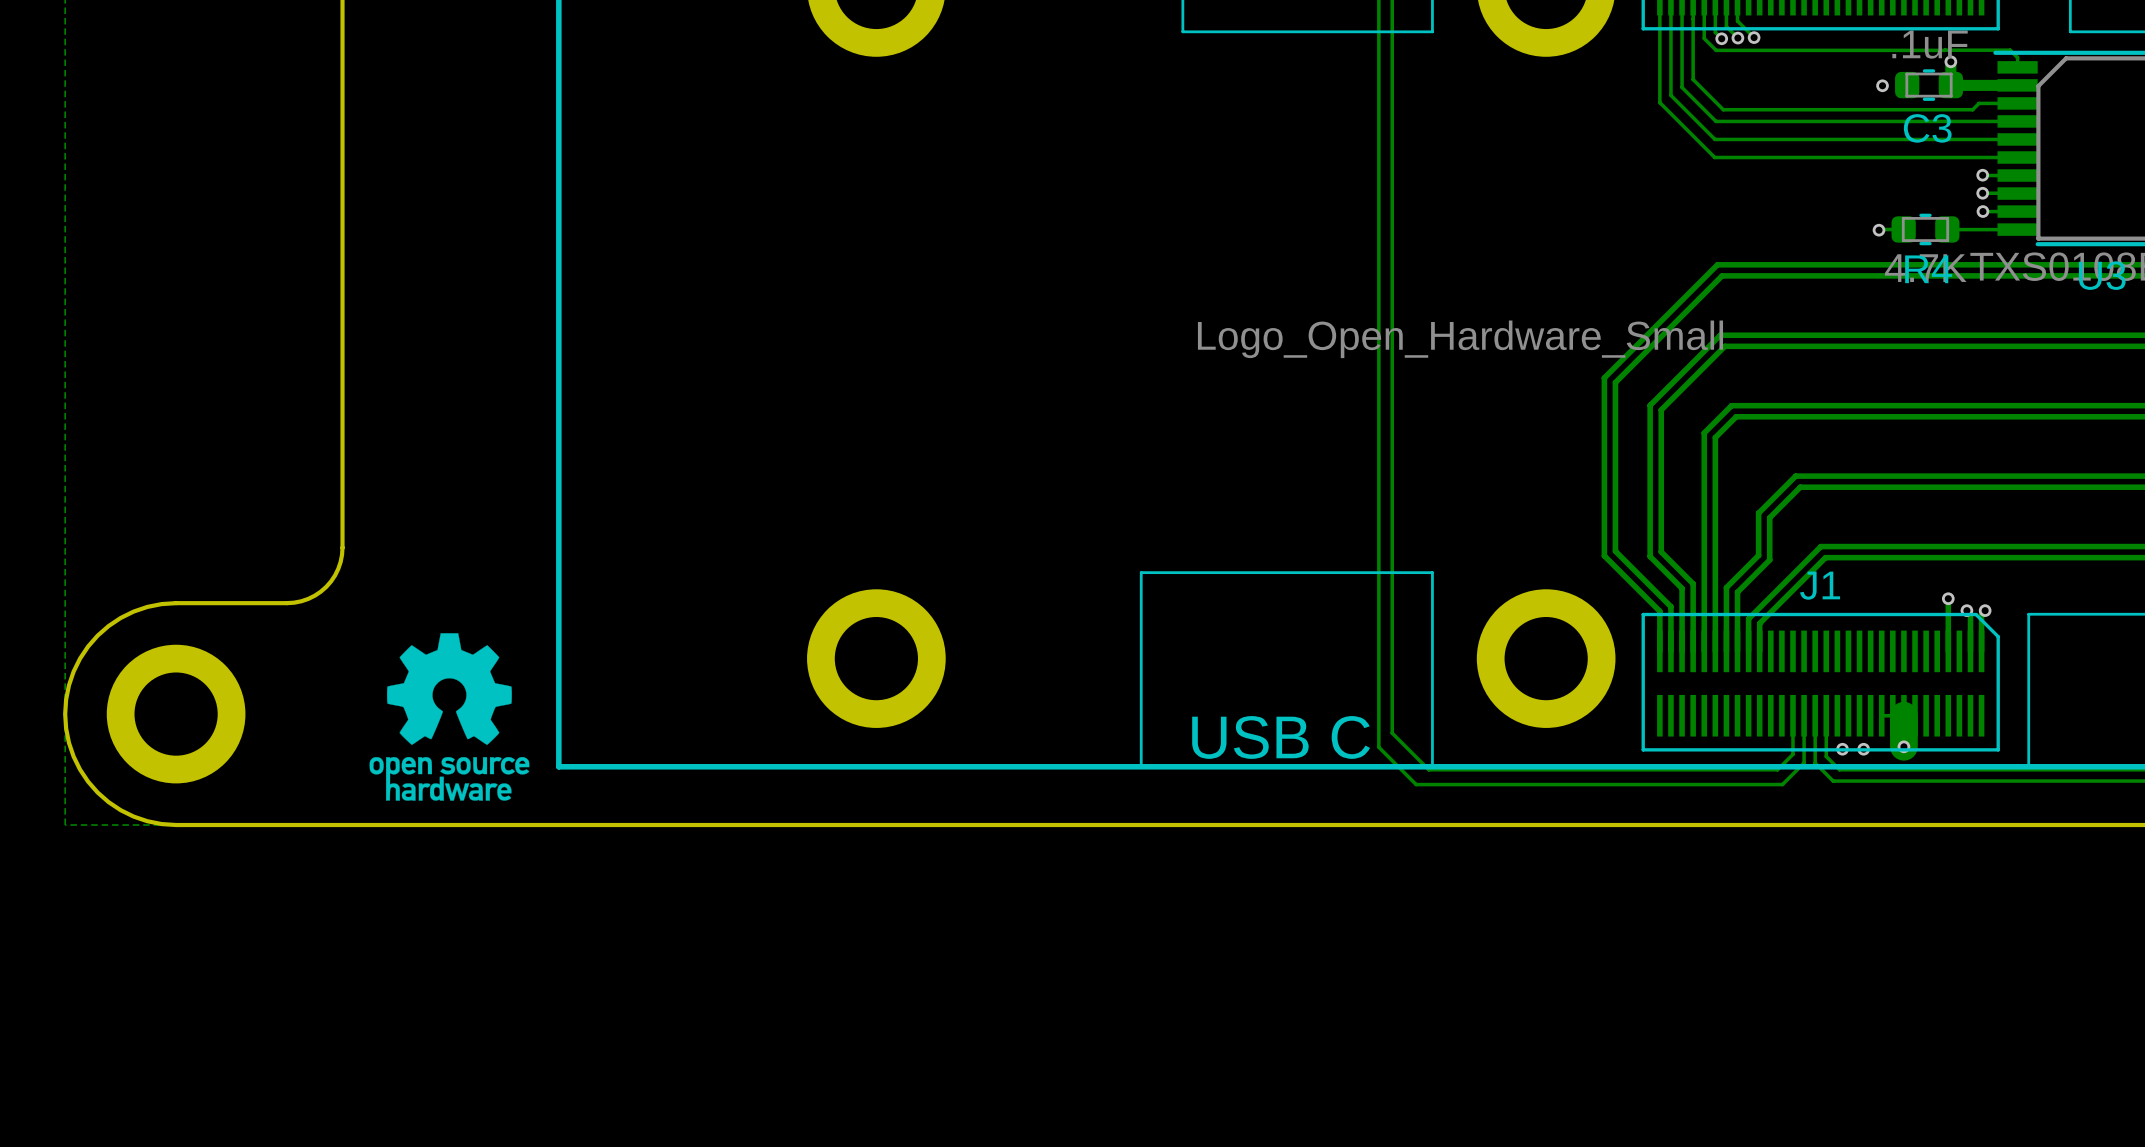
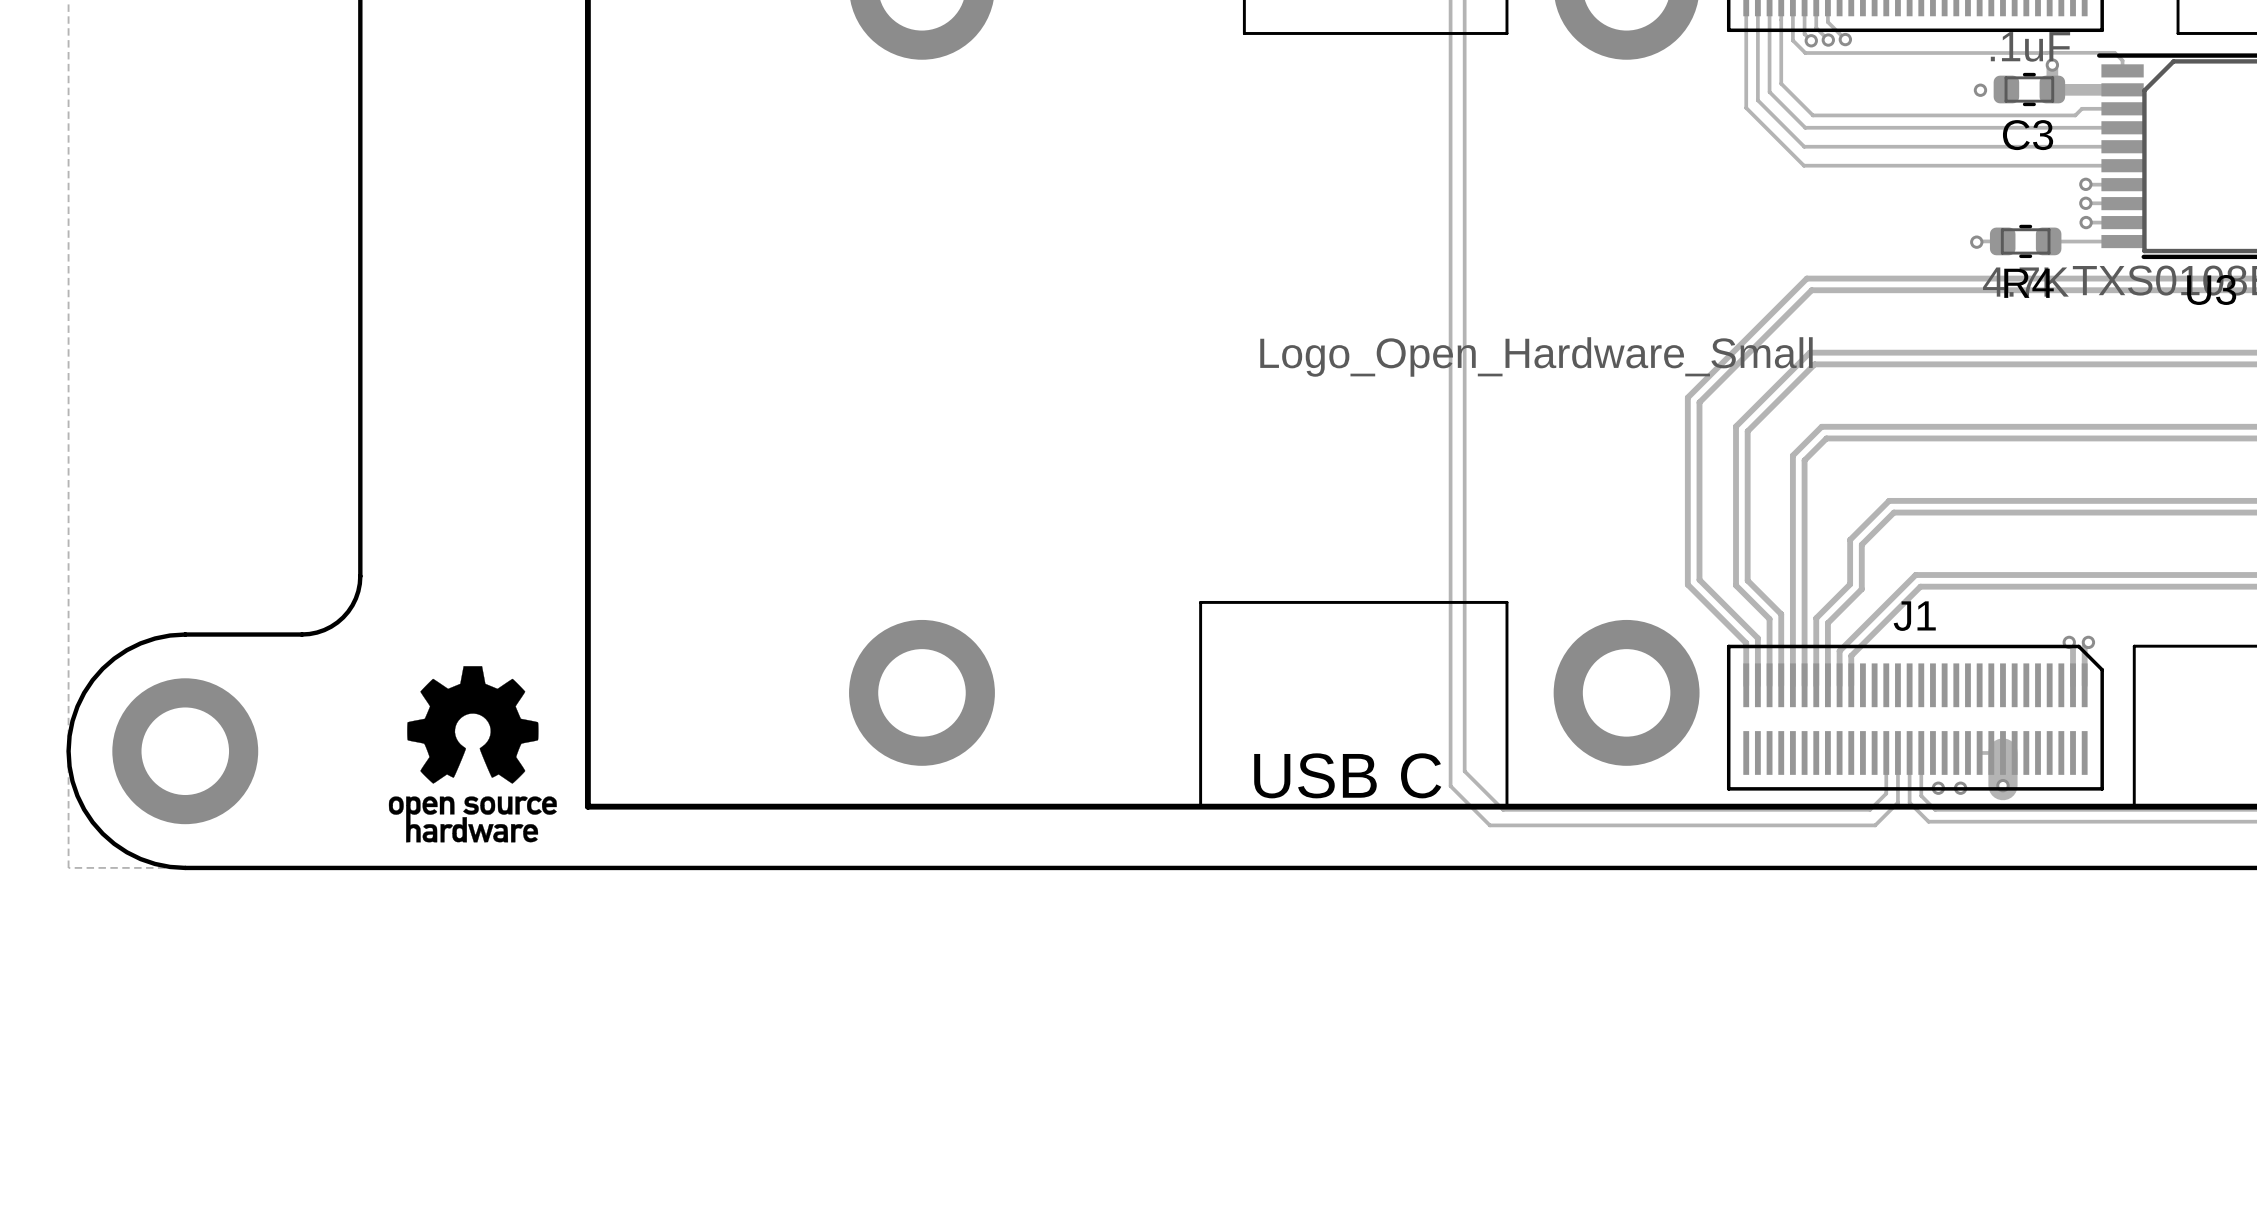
track: (1948, 598) (1948, 651) -> none
via: (1948, 598) -> none

